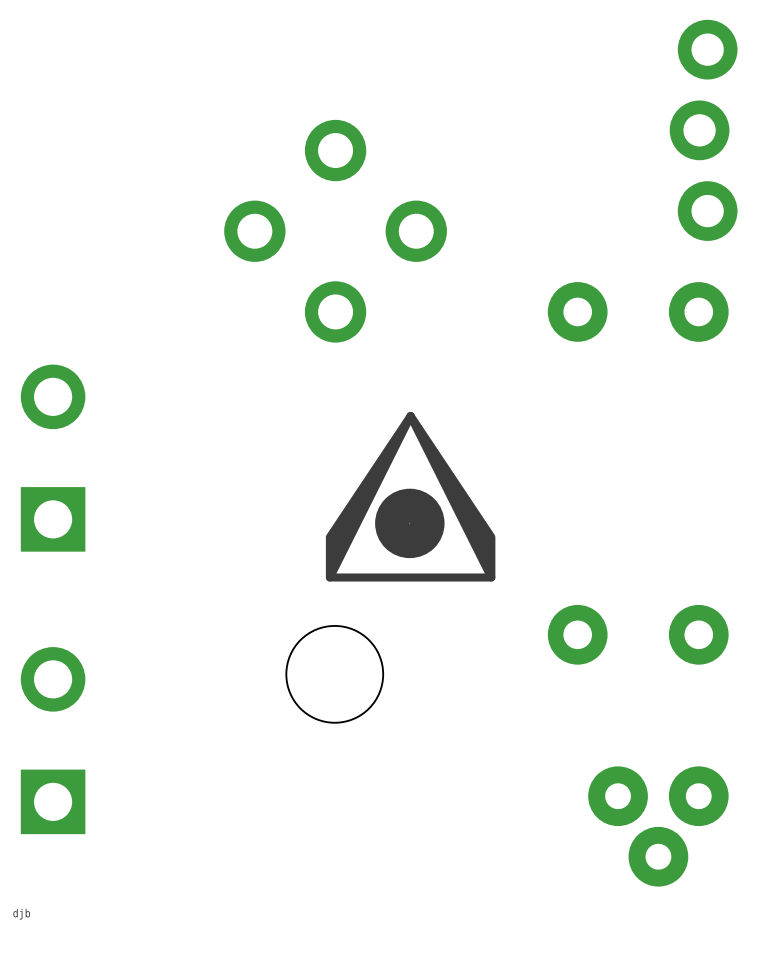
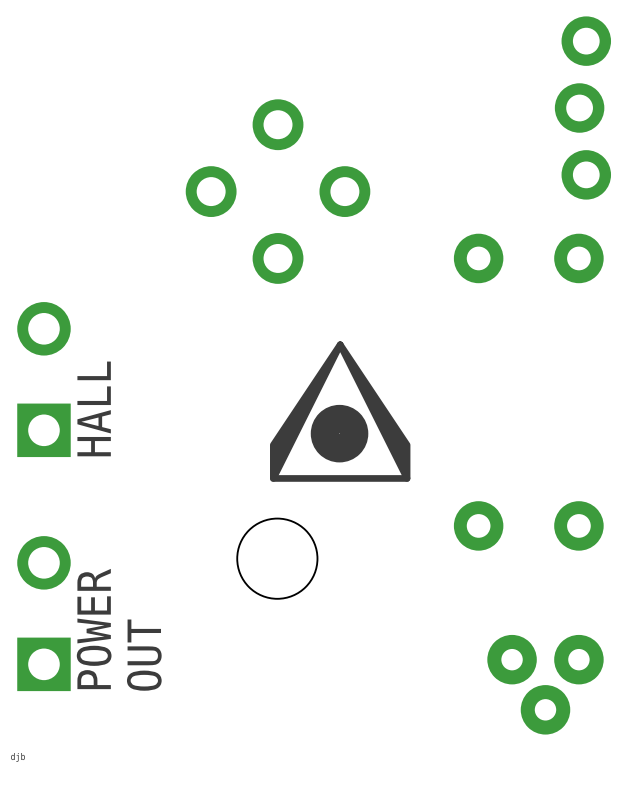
text: none -> HALL (94, 408)
text: none -> POWER (94, 628)
text: none -> OUT (144, 655)

